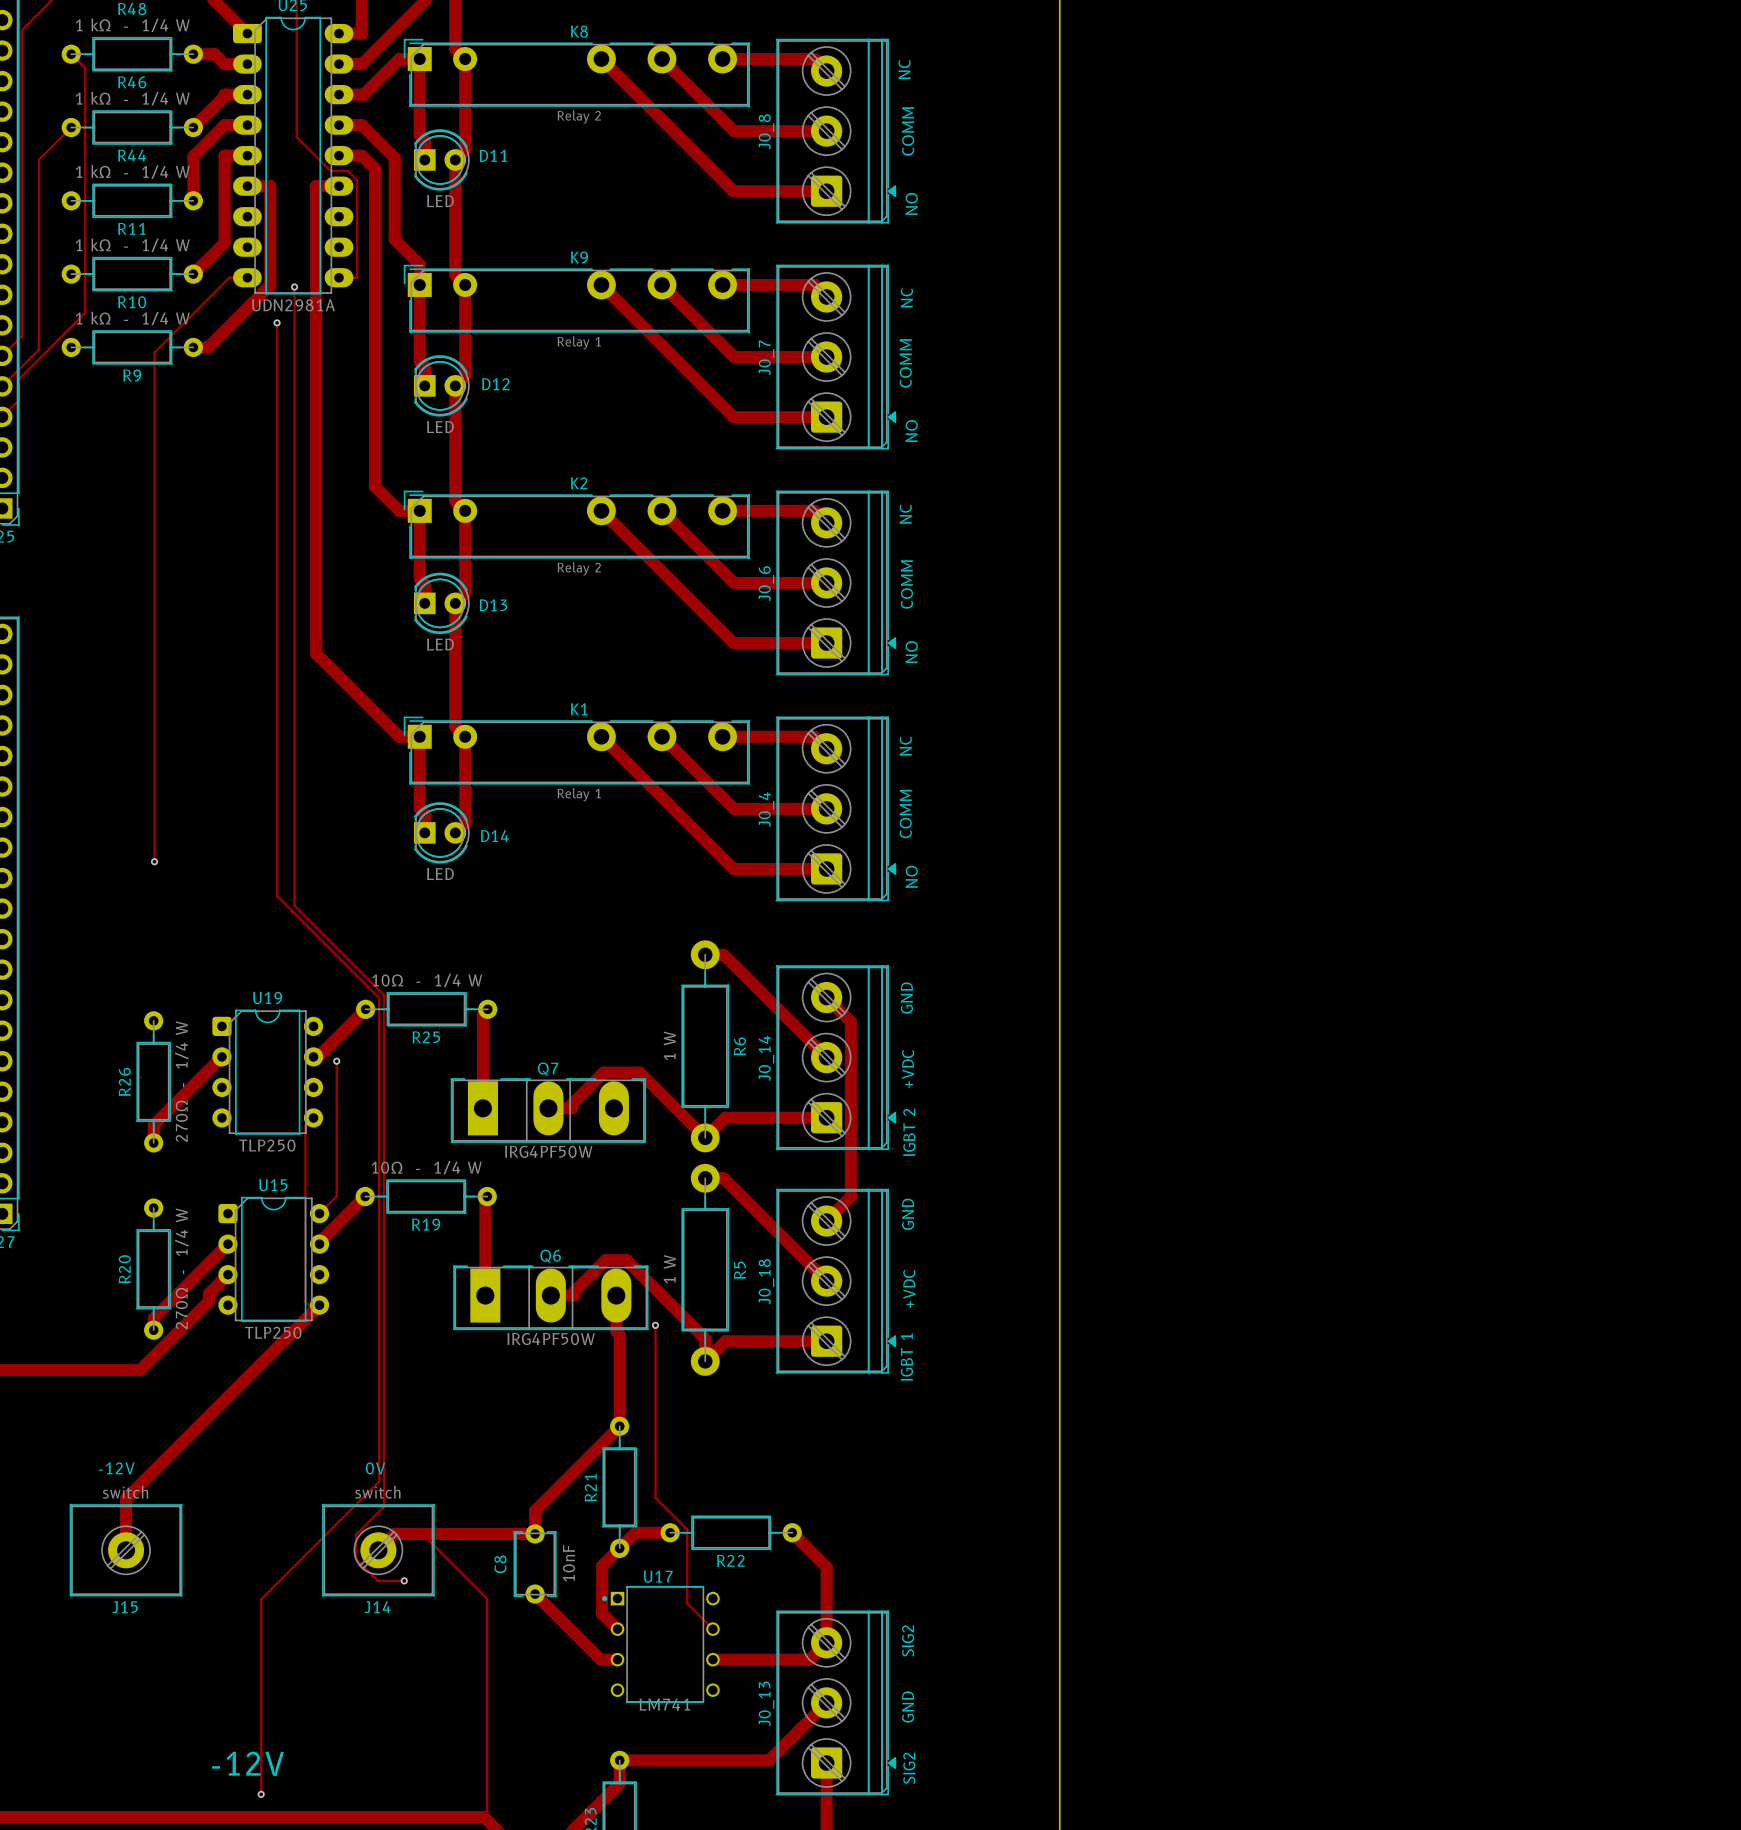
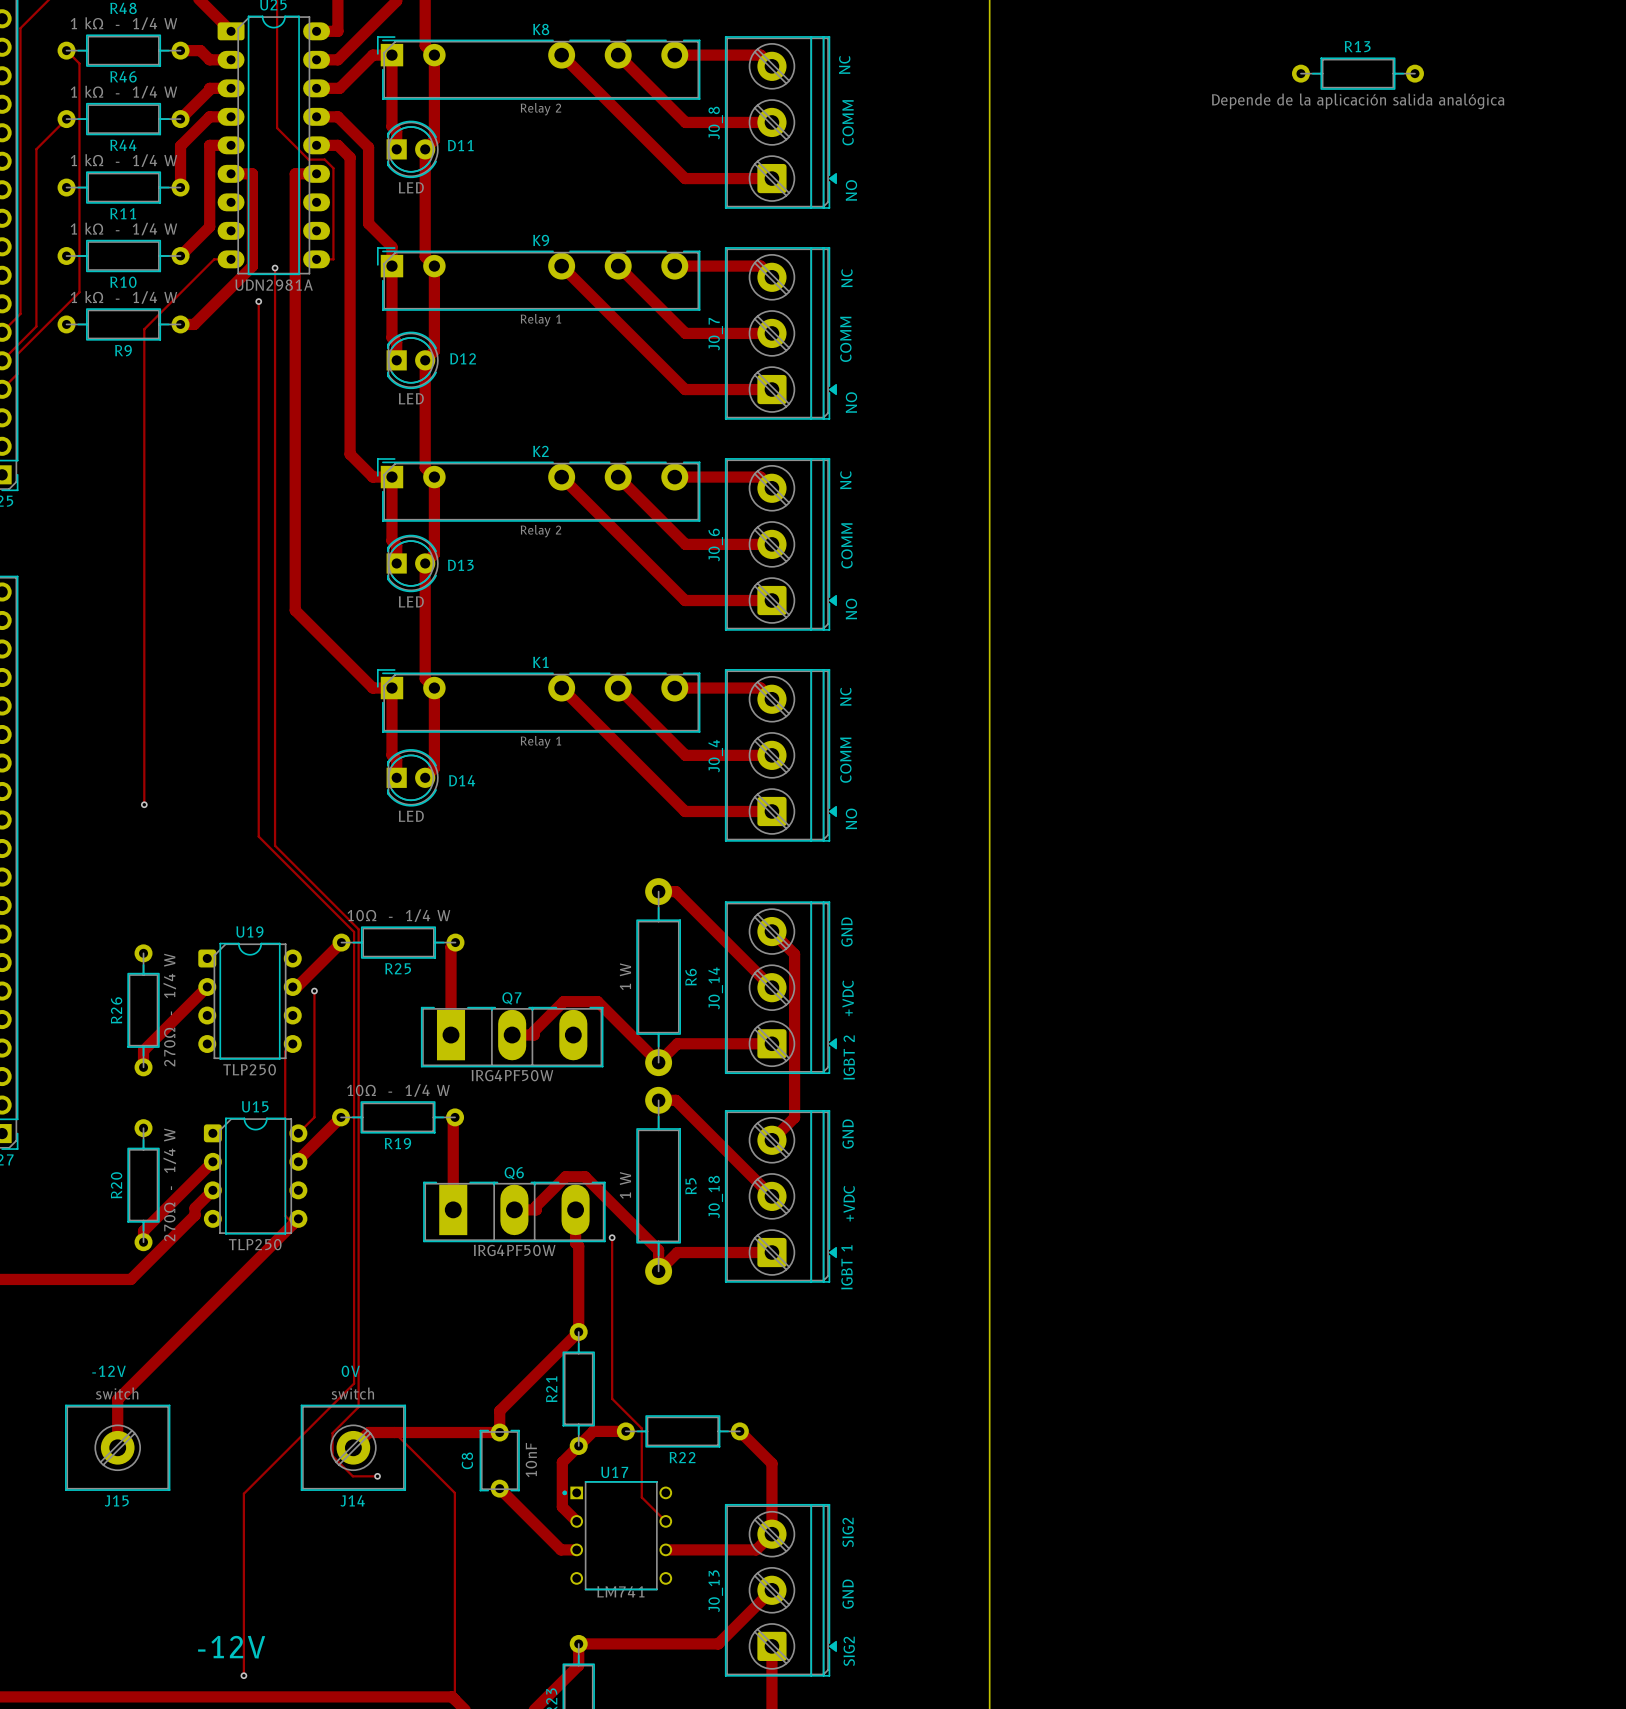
R13: none -> Depende de la aplicación salida analógica (1357, 73)

